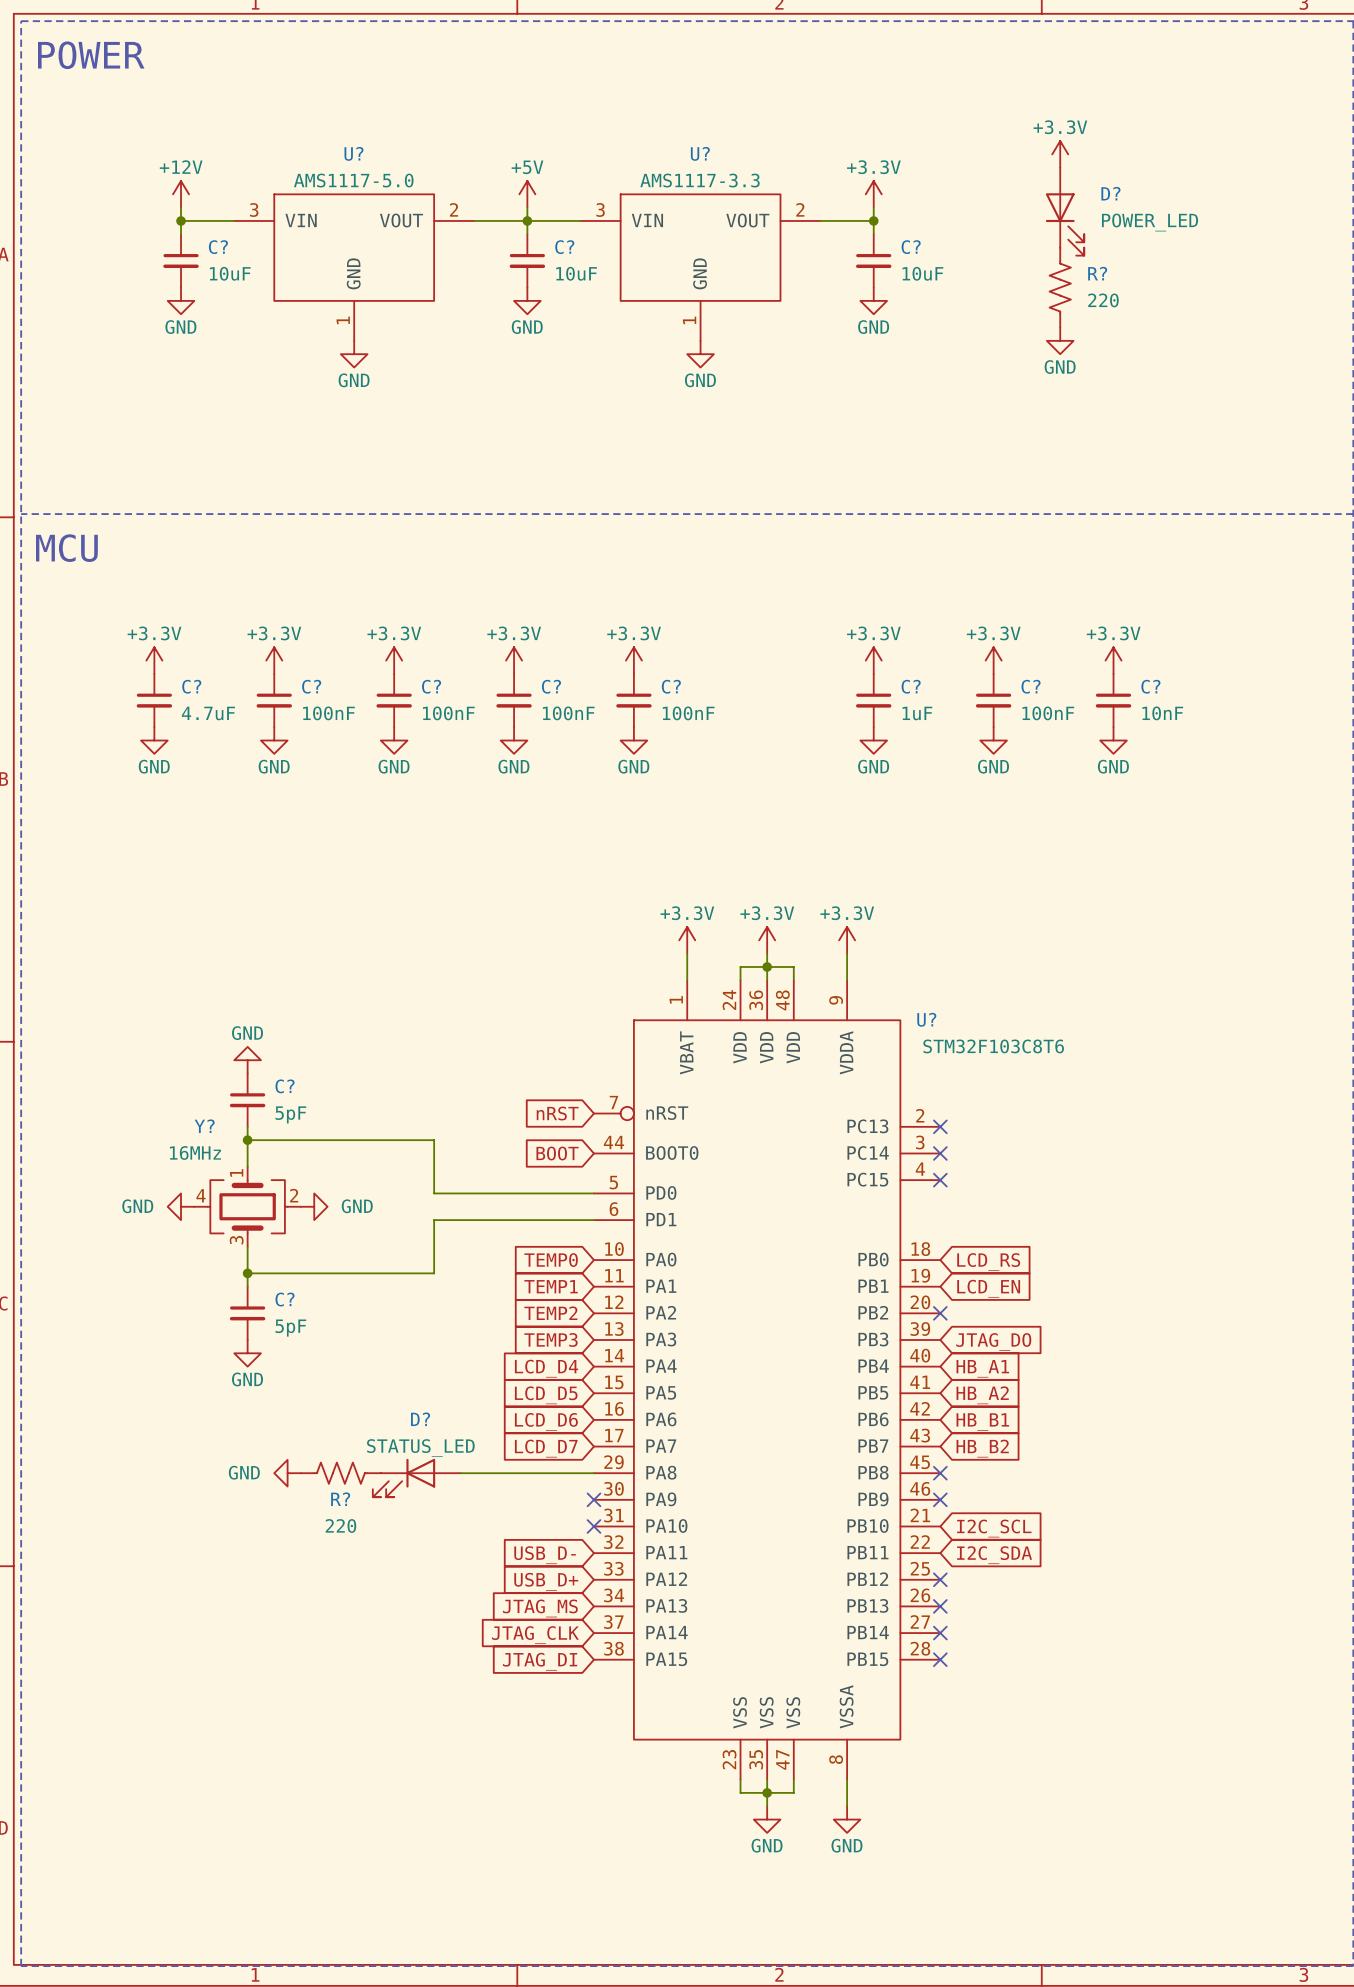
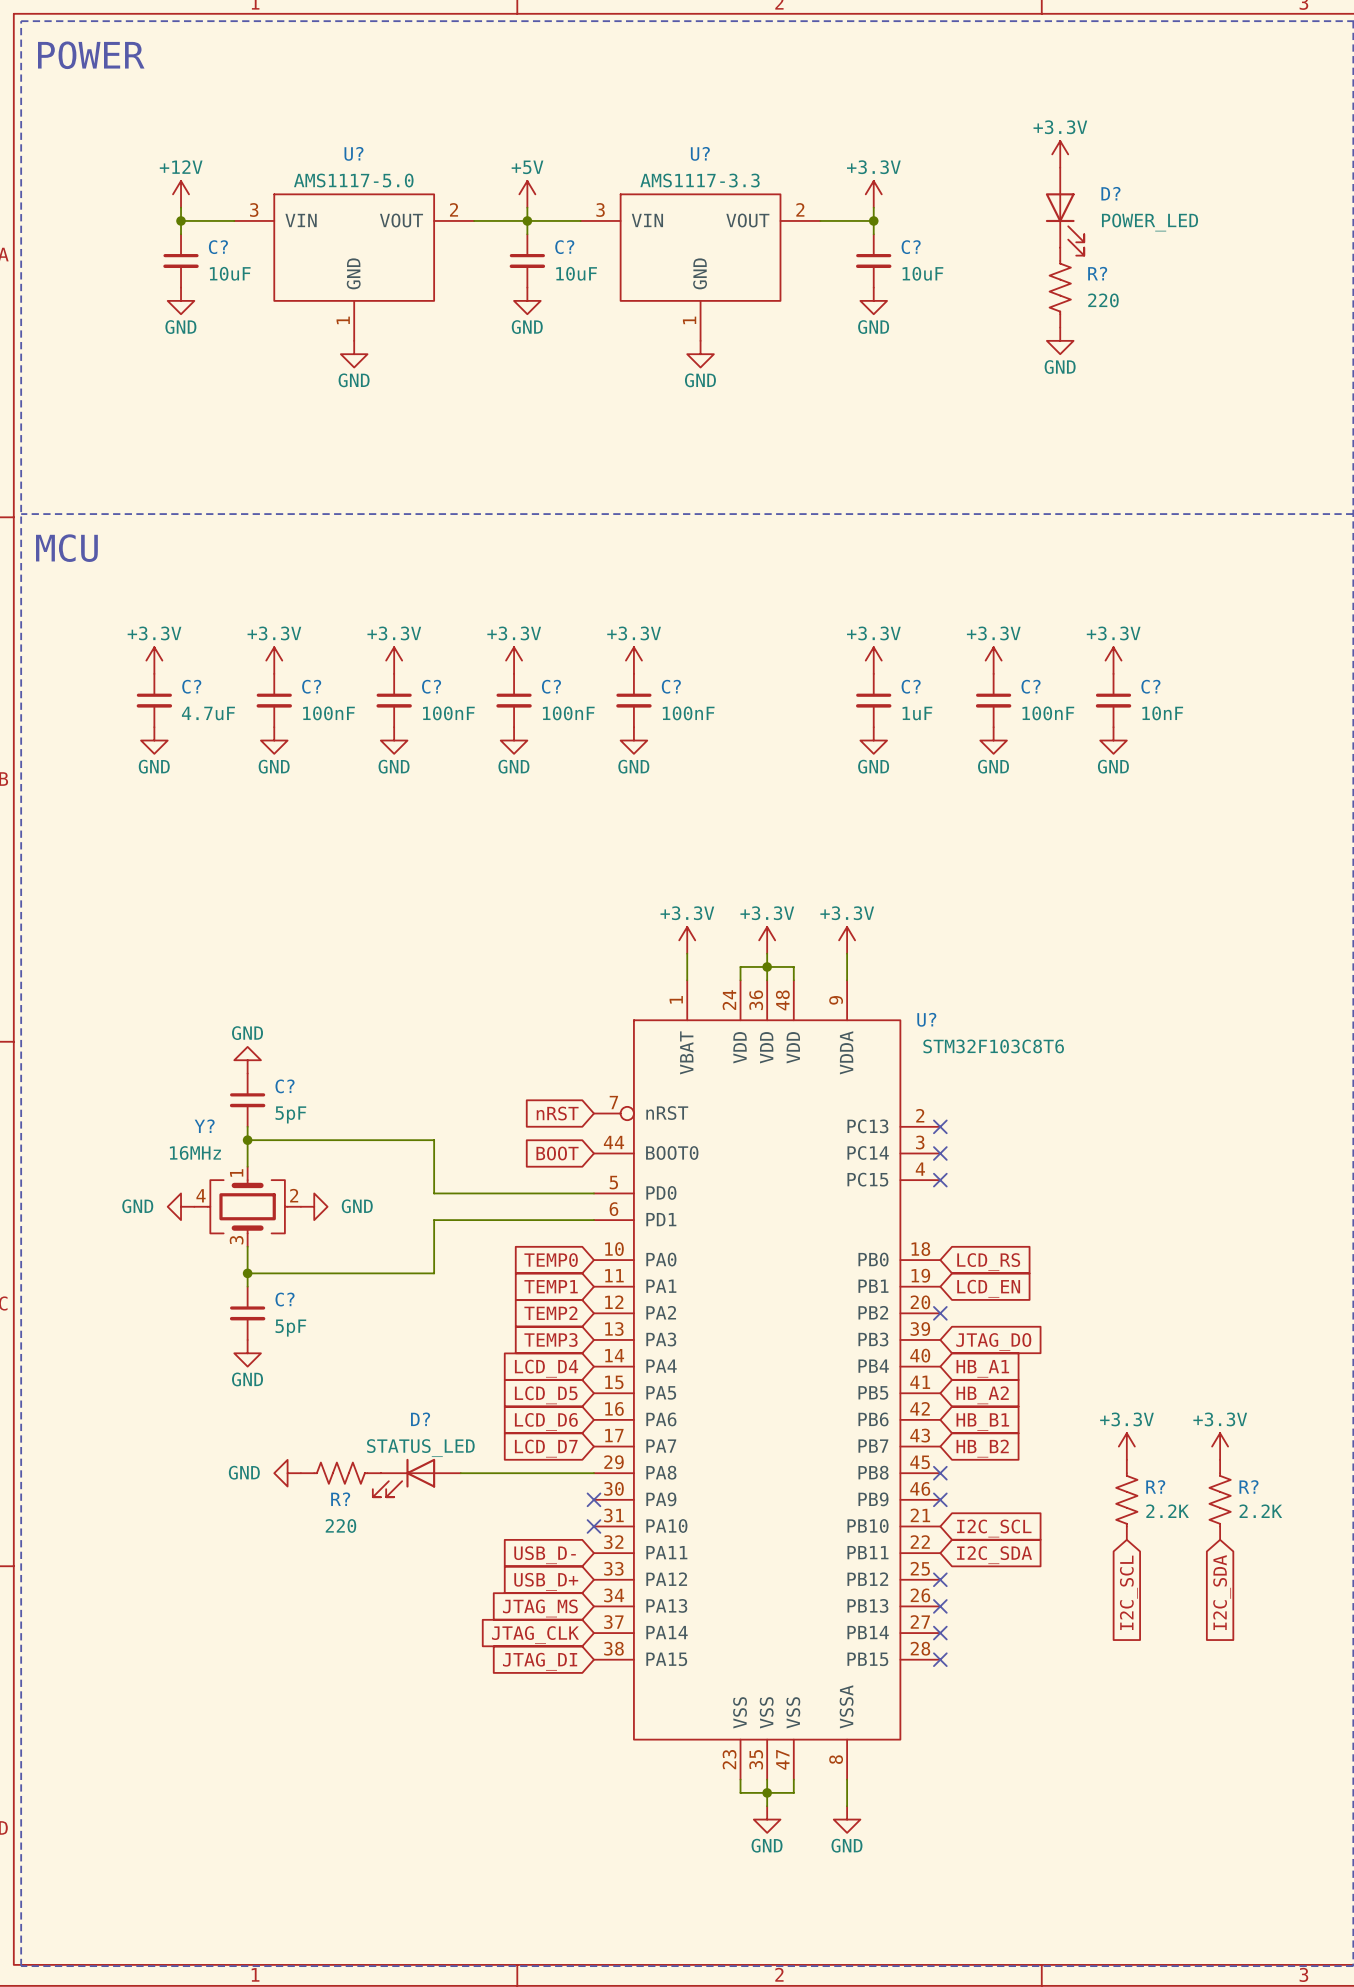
power symbol: none -> +3.3V (1126, 1446)
power symbol: none -> +3.3V (1220, 1446)
R?: none -> 2.2K (1126, 1499)
R?: none -> 2.2K (1220, 1499)
global label: none -> I2C_SCL (1128, 1592)
global label: none -> I2C_SDA (1222, 1592)

